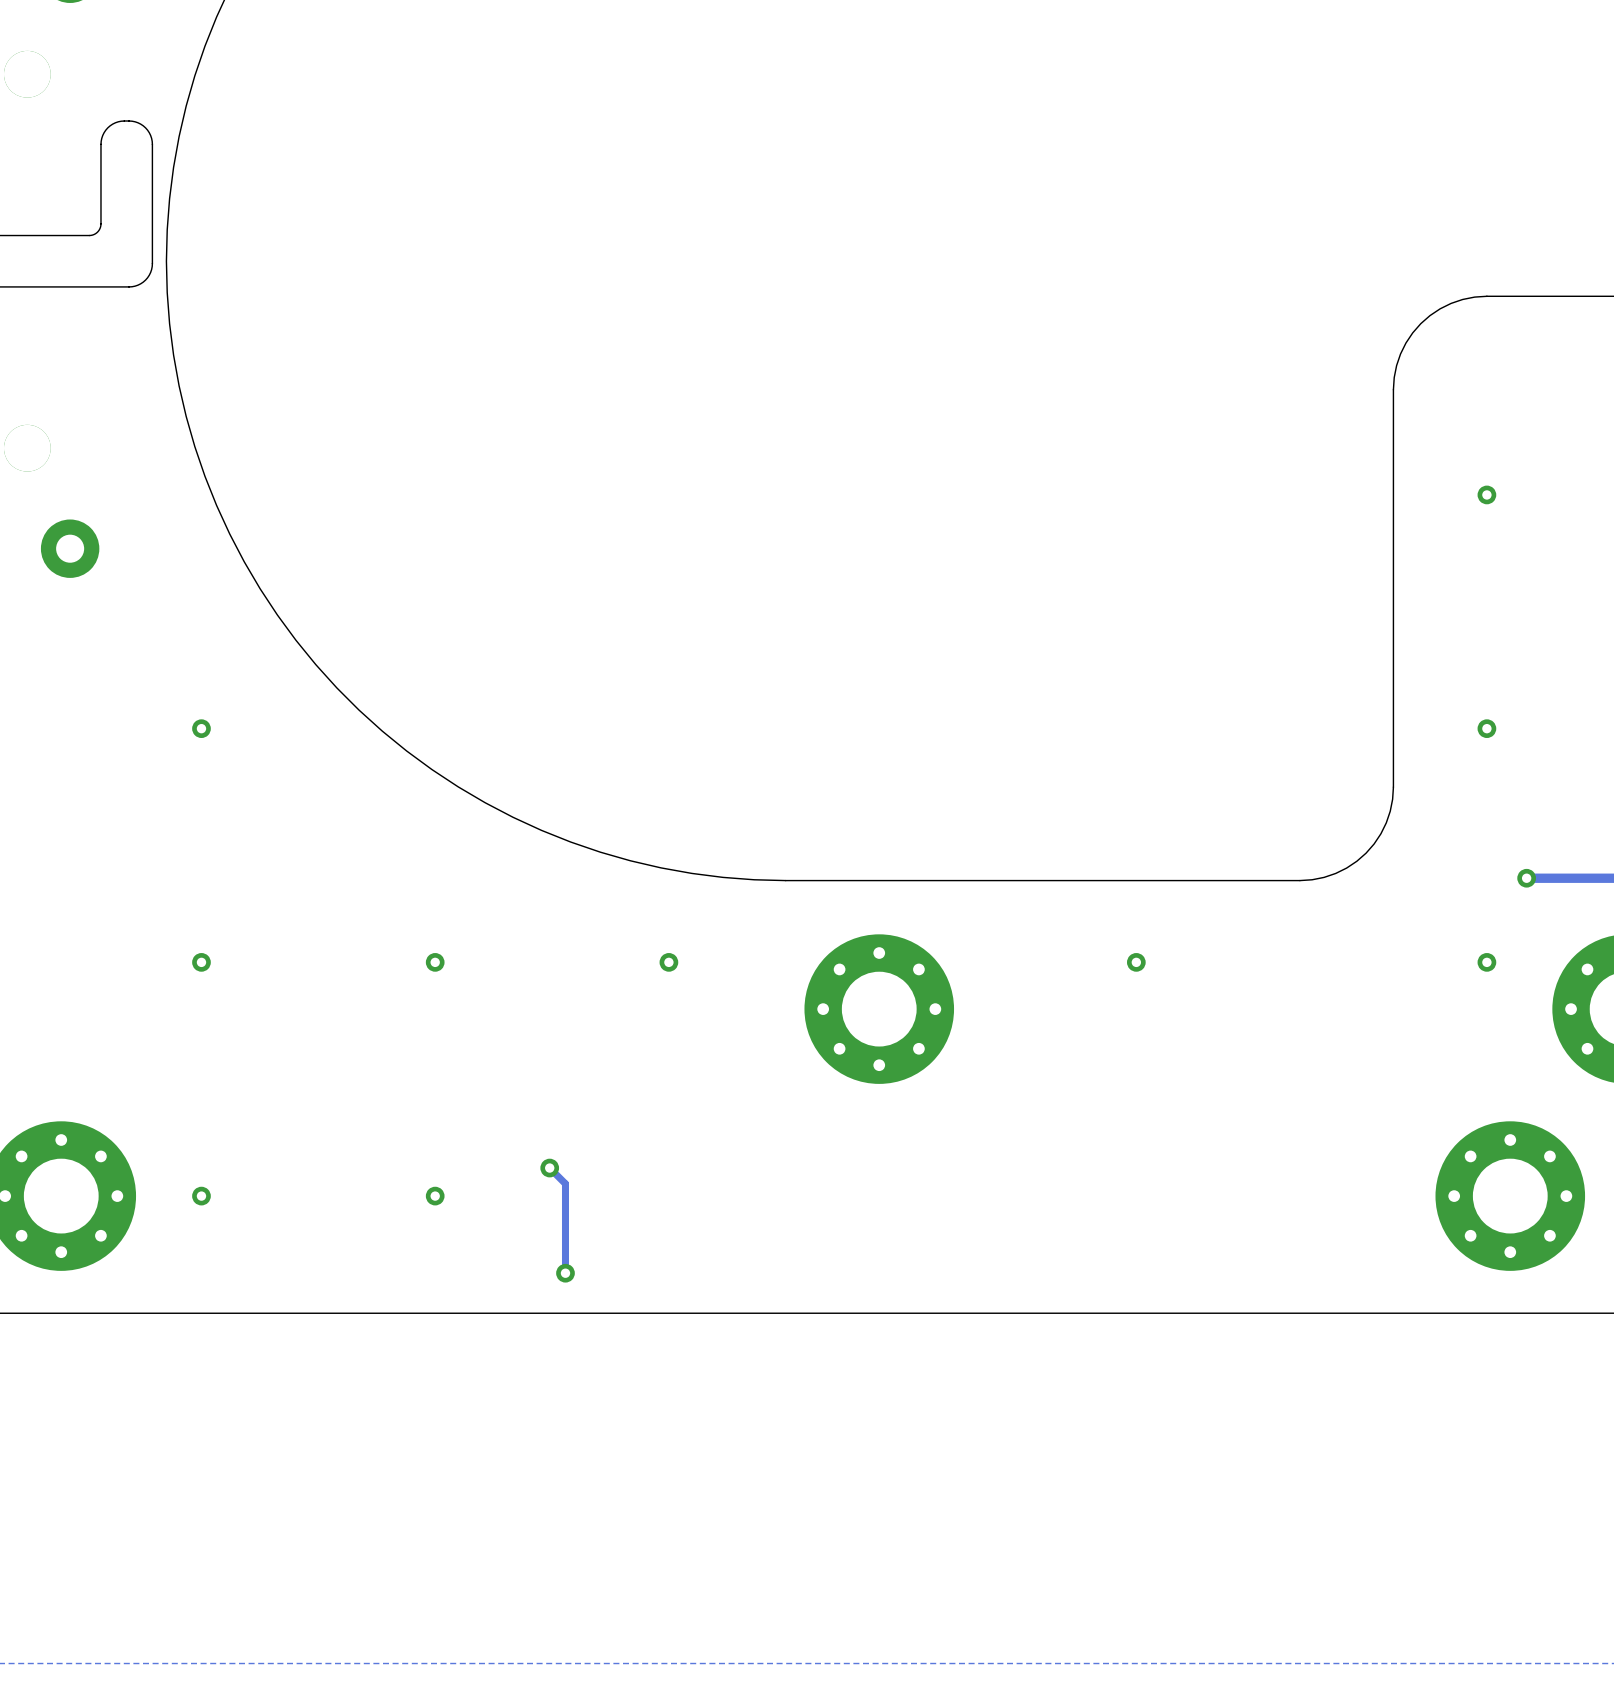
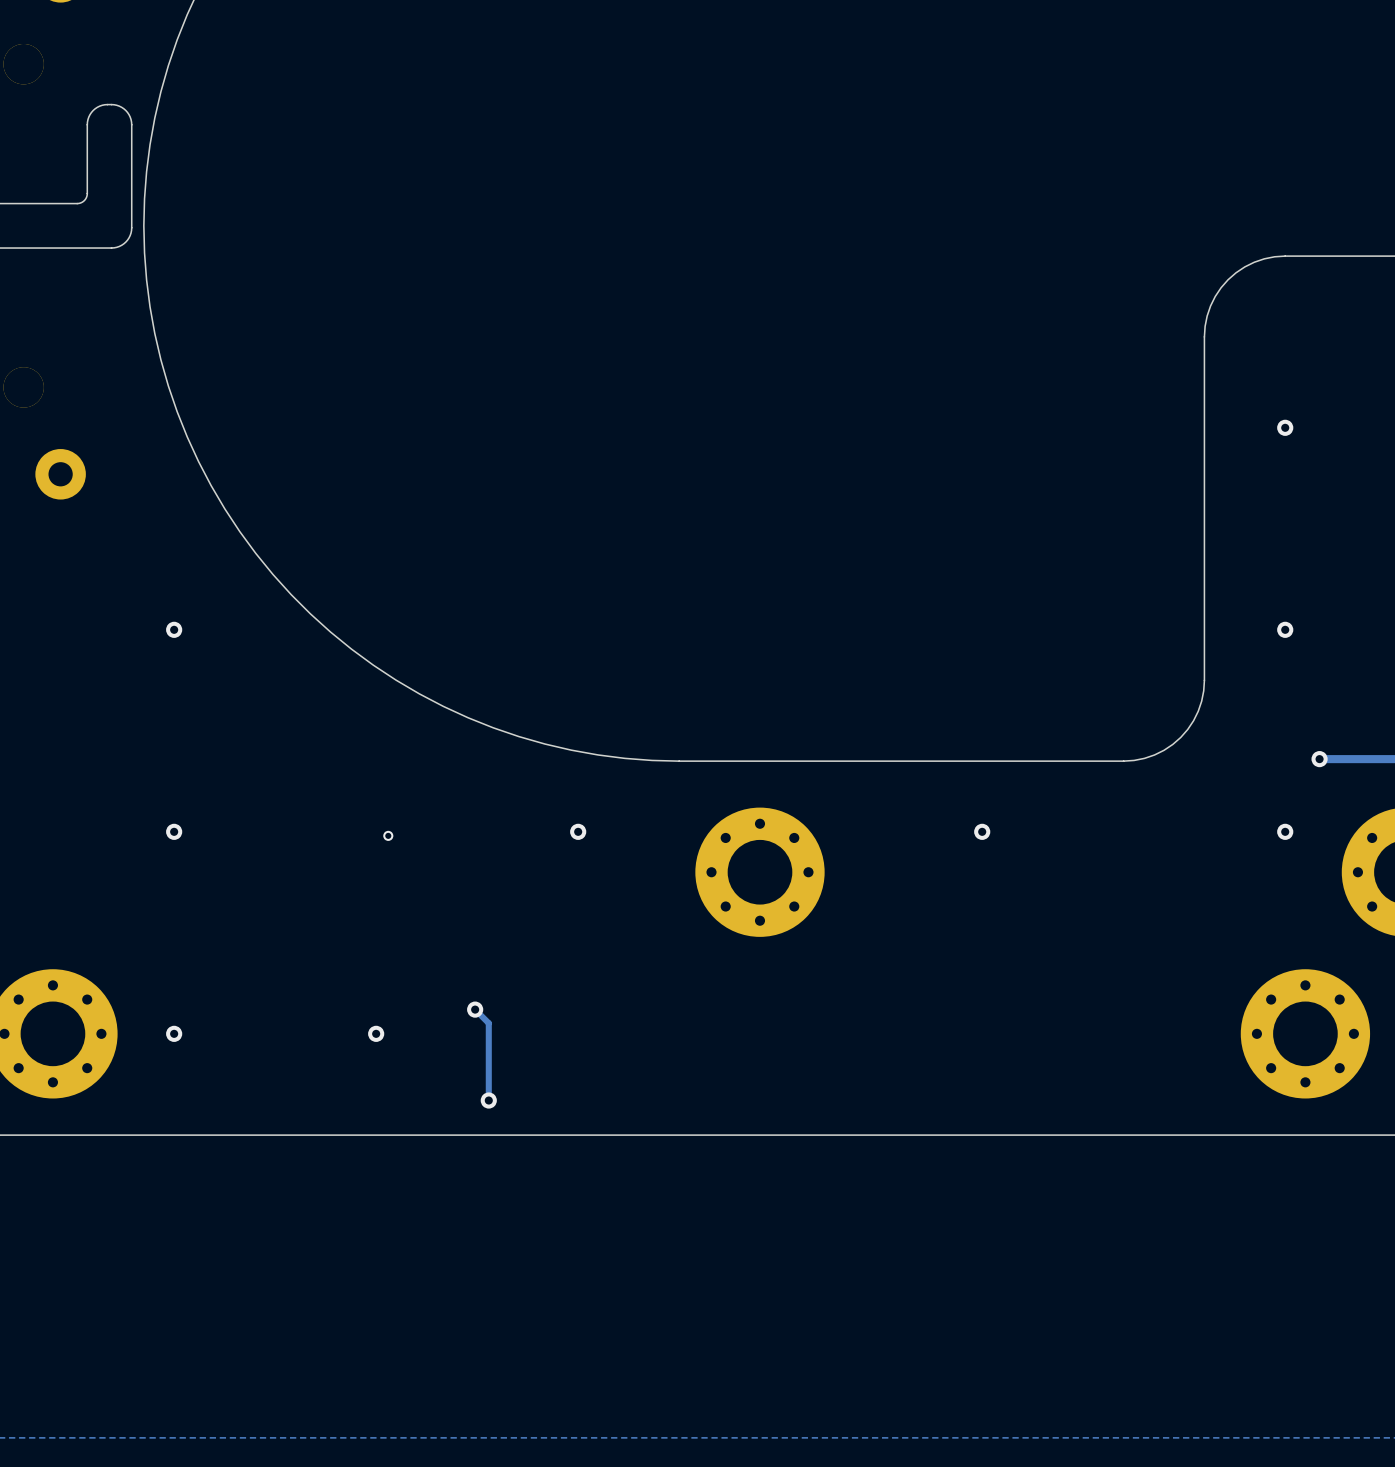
via position: (435, 962) -> (388, 835)

